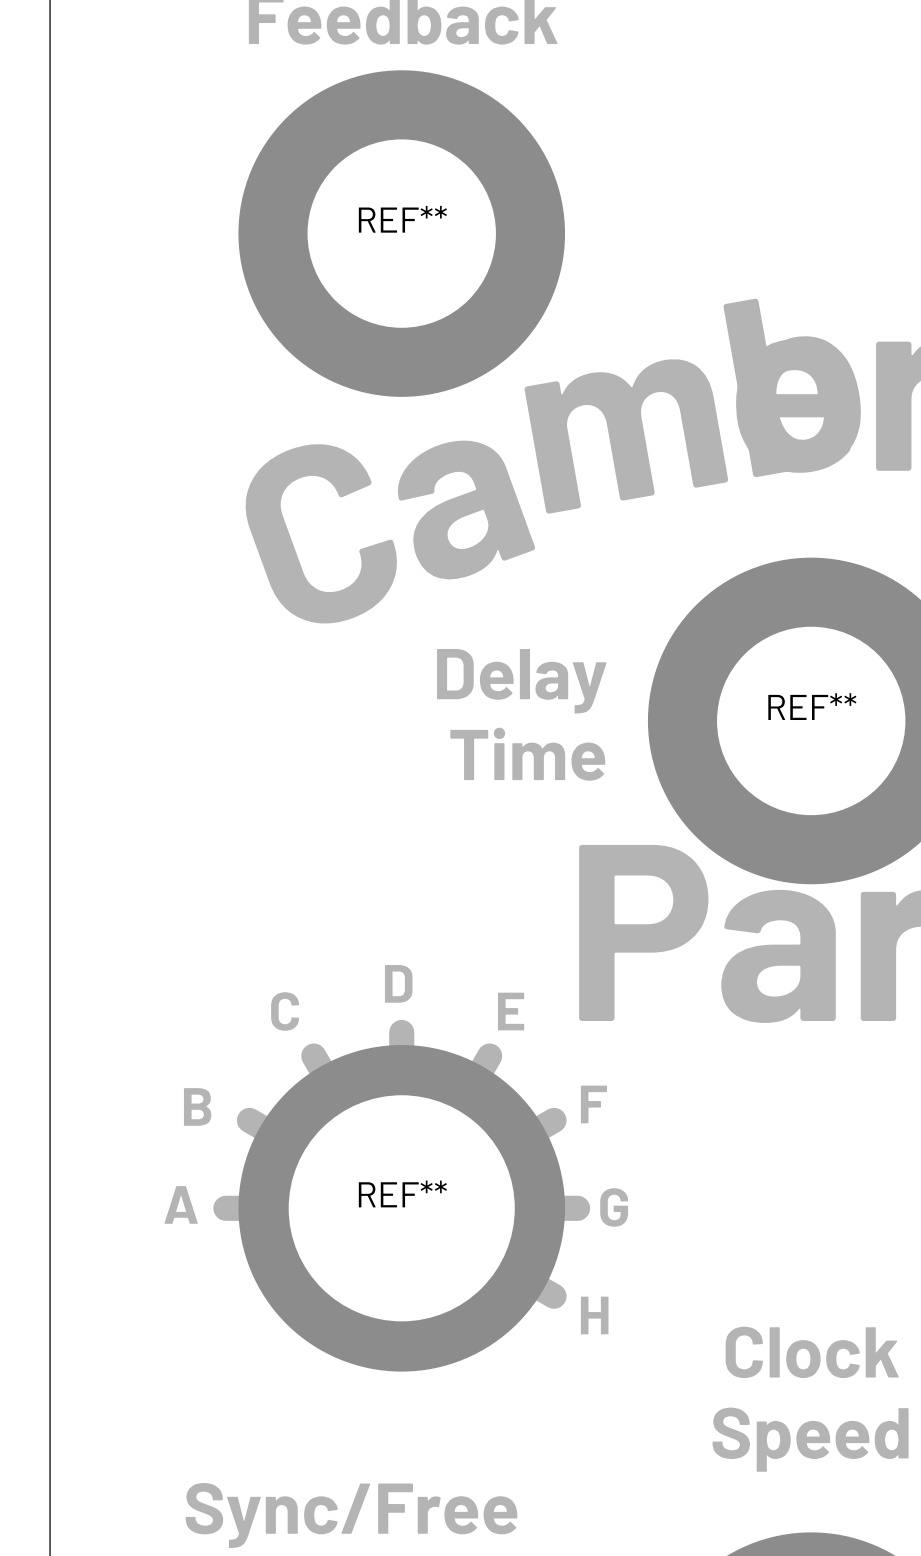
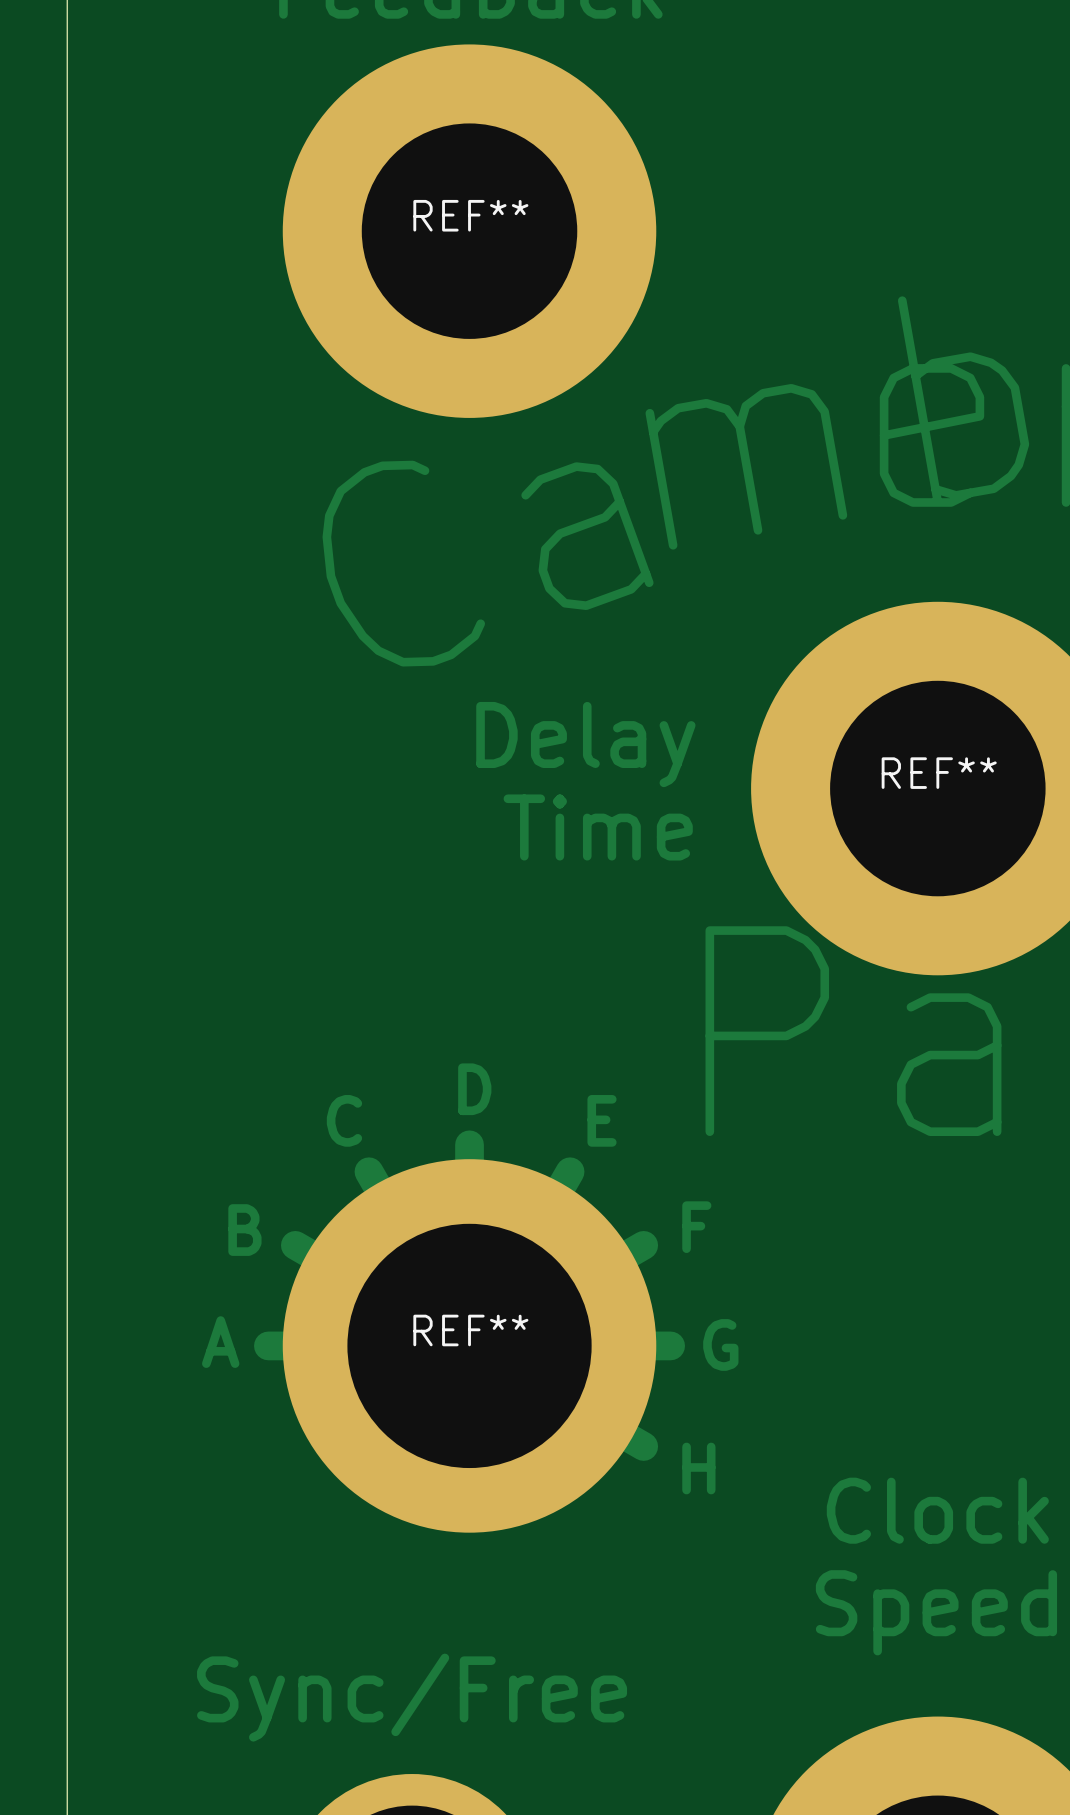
REF** footprint: [238, 1045, 566, 1372] -> [282, 1159, 657, 1533]

